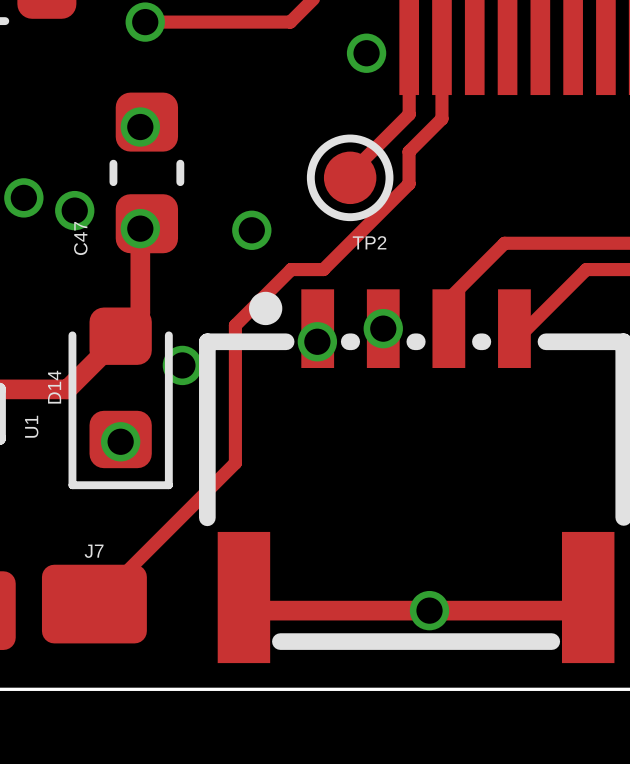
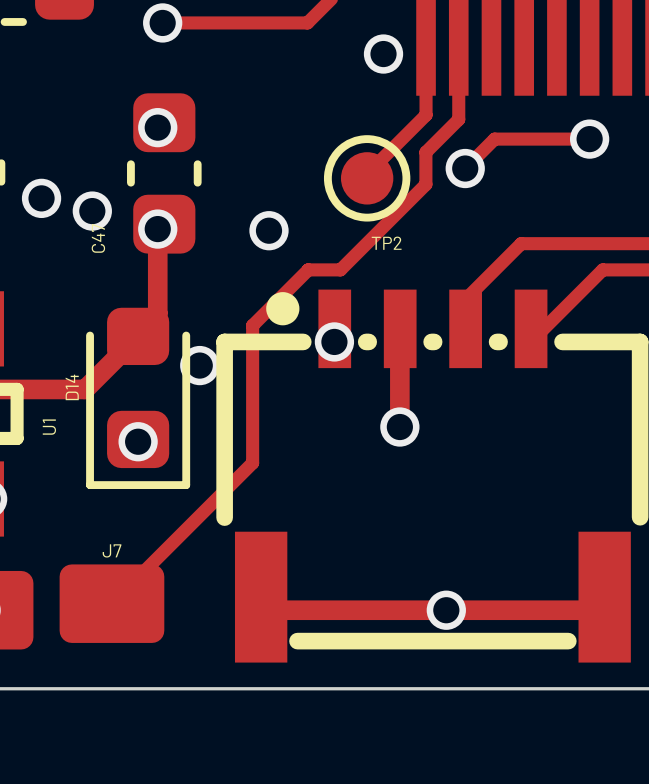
track: none -> (589, 139) (494, 139) (465, 168)
via: none -> (589, 139)
via: none -> (465, 168)
via: (383, 328) -> none
track: none -> (399, 341) (399, 427)
via: none -> (399, 427)

